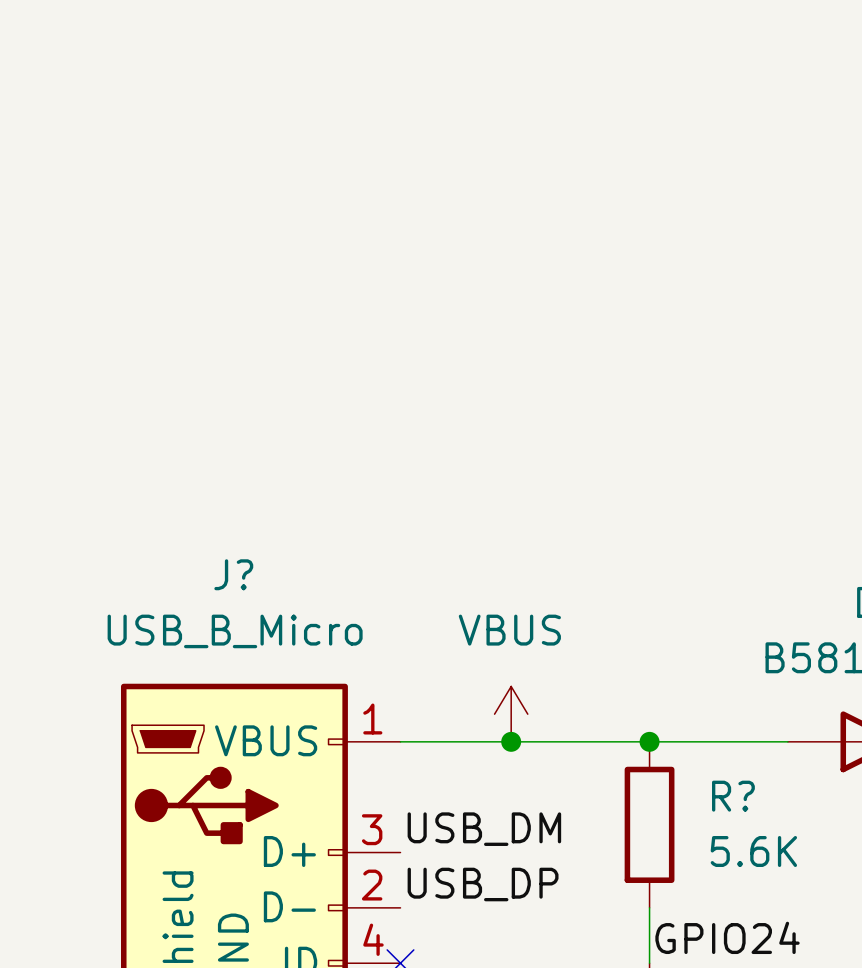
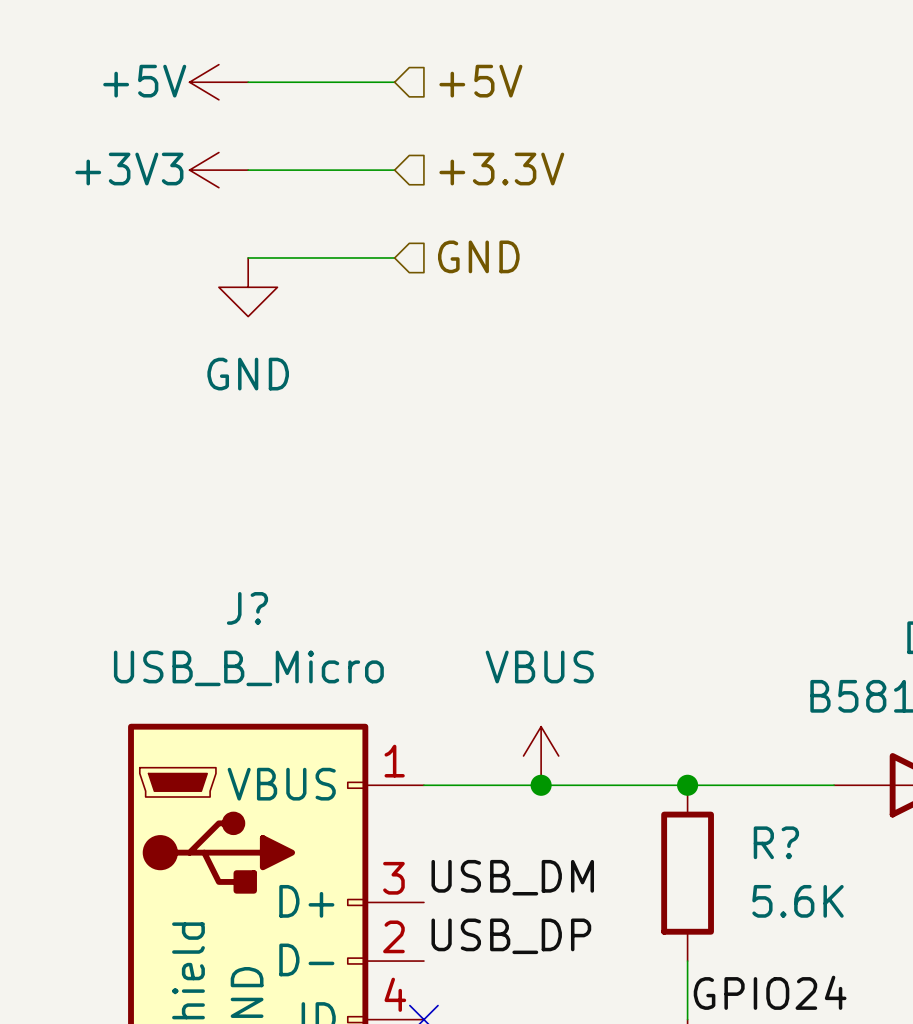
hierarchical label: none -> +5V (480, 81)
power symbol: none -> +5V (218, 82)
wire: none -> (248, 82) (394, 82)
hierarchical label: none -> +3.3V (501, 169)
power symbol: none -> +3V3 (218, 170)
wire: none -> (248, 170) (394, 170)
hierarchical label: none -> GND (478, 256)
wire: none -> (248, 257) (394, 257)
power symbol: none -> GND (248, 287)

